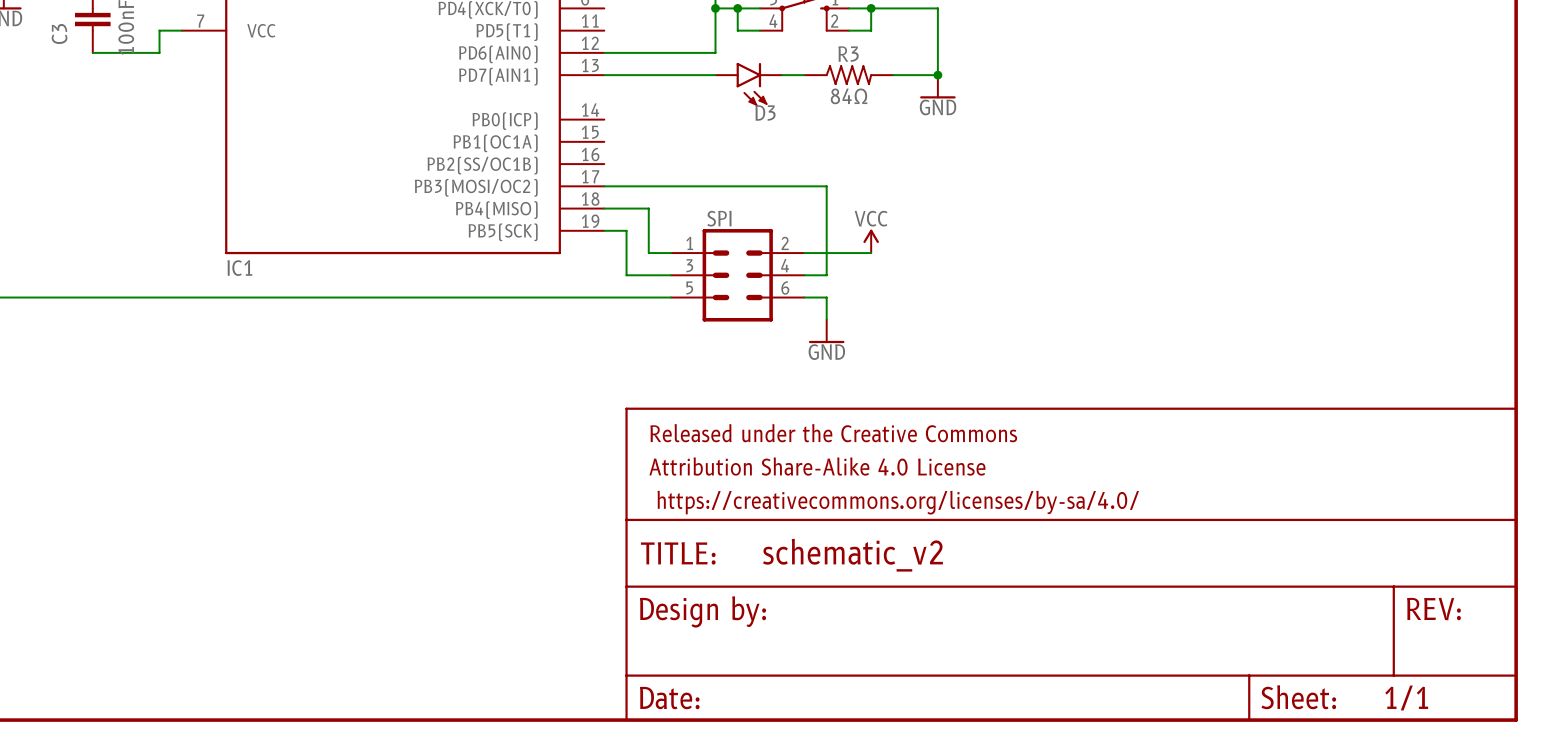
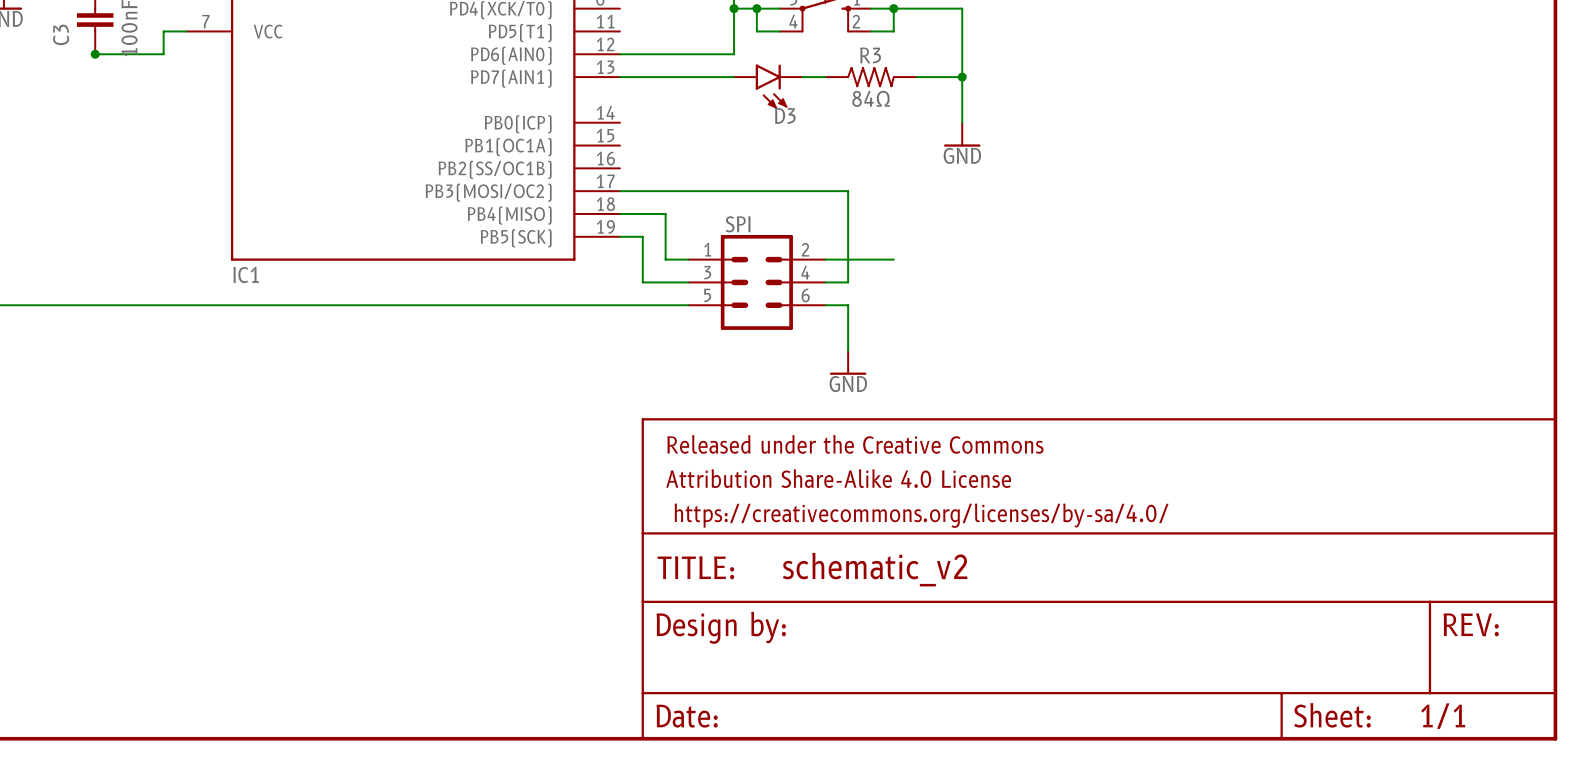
junction: none -> (95, 54)
power symbol position: GND (937, 86) -> GND (962, 134)
power symbol: VCC (871, 241) -> none
power symbol position: GND (826, 331) -> GND (848, 362)

